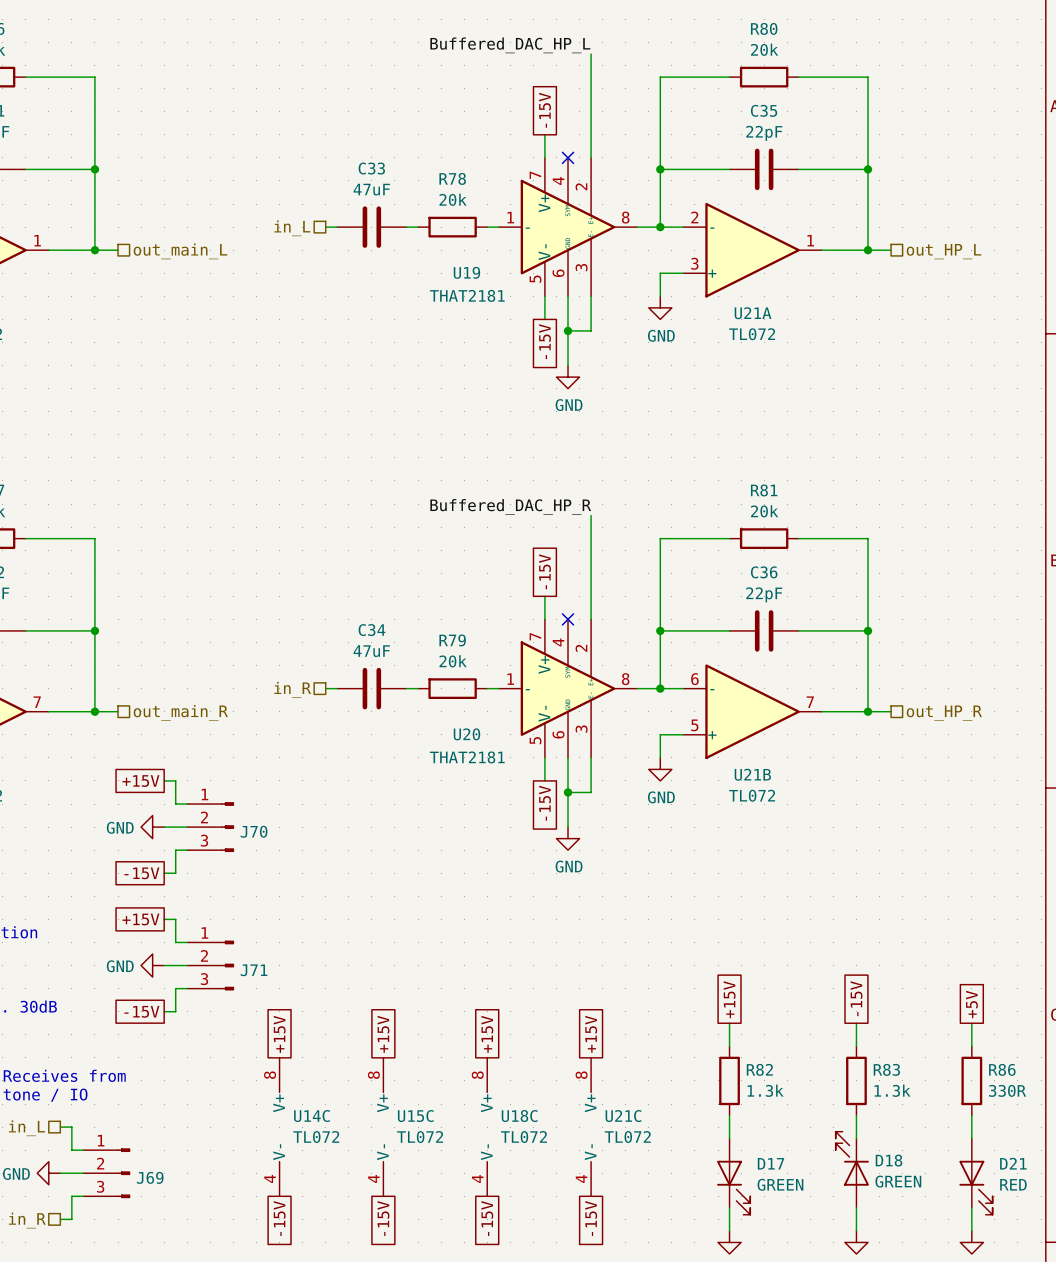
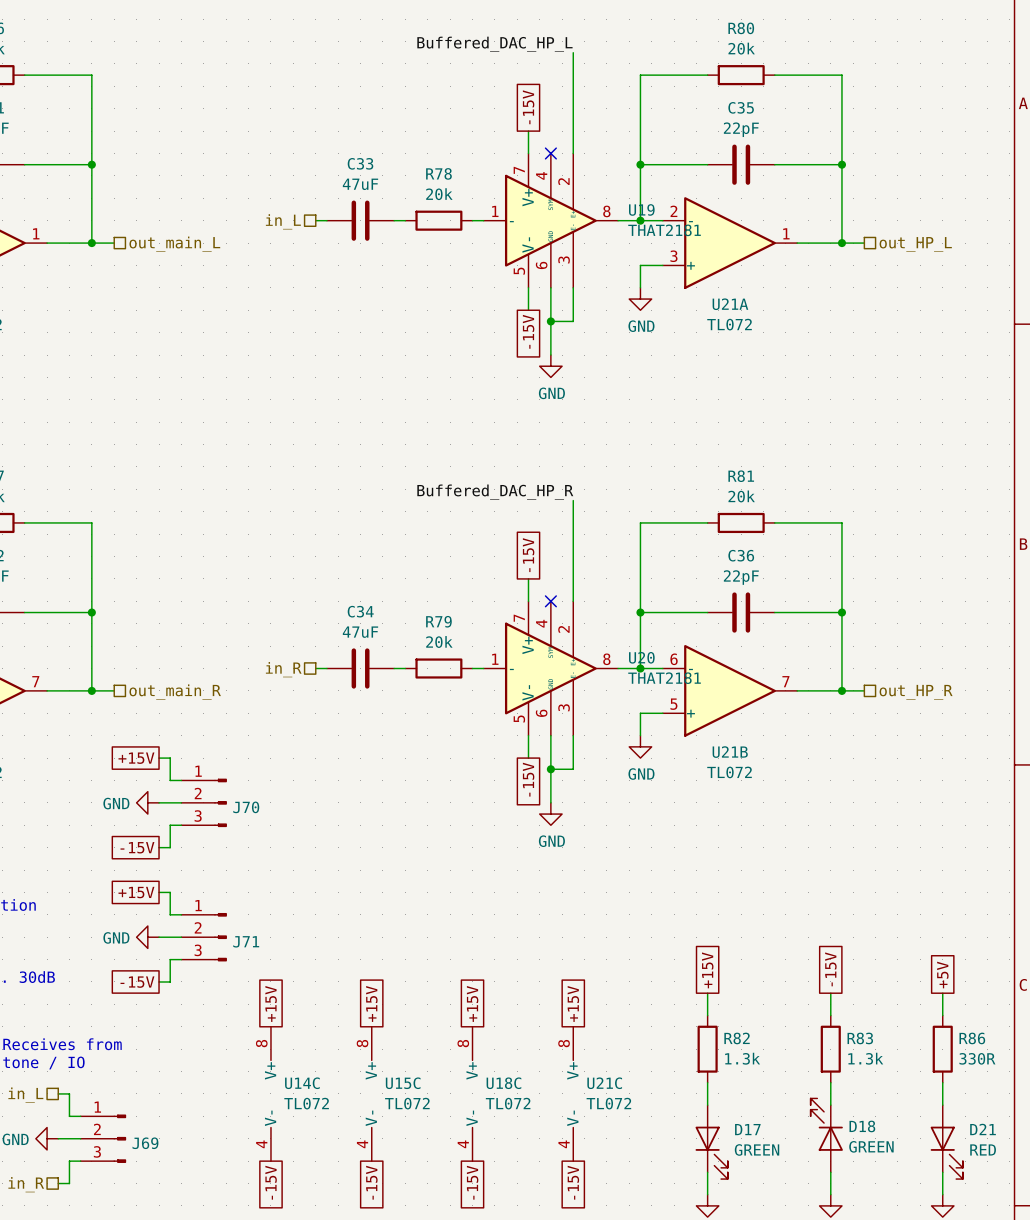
U19 name position: U19 (466, 272) -> U19 (641, 209)
U19 value position: THAT2181 (467, 295) -> THAT2181 (664, 230)
U20 name position: U20 (466, 734) -> U20 (641, 657)
U20 value position: THAT2181 (467, 757) -> THAT2181 (664, 678)

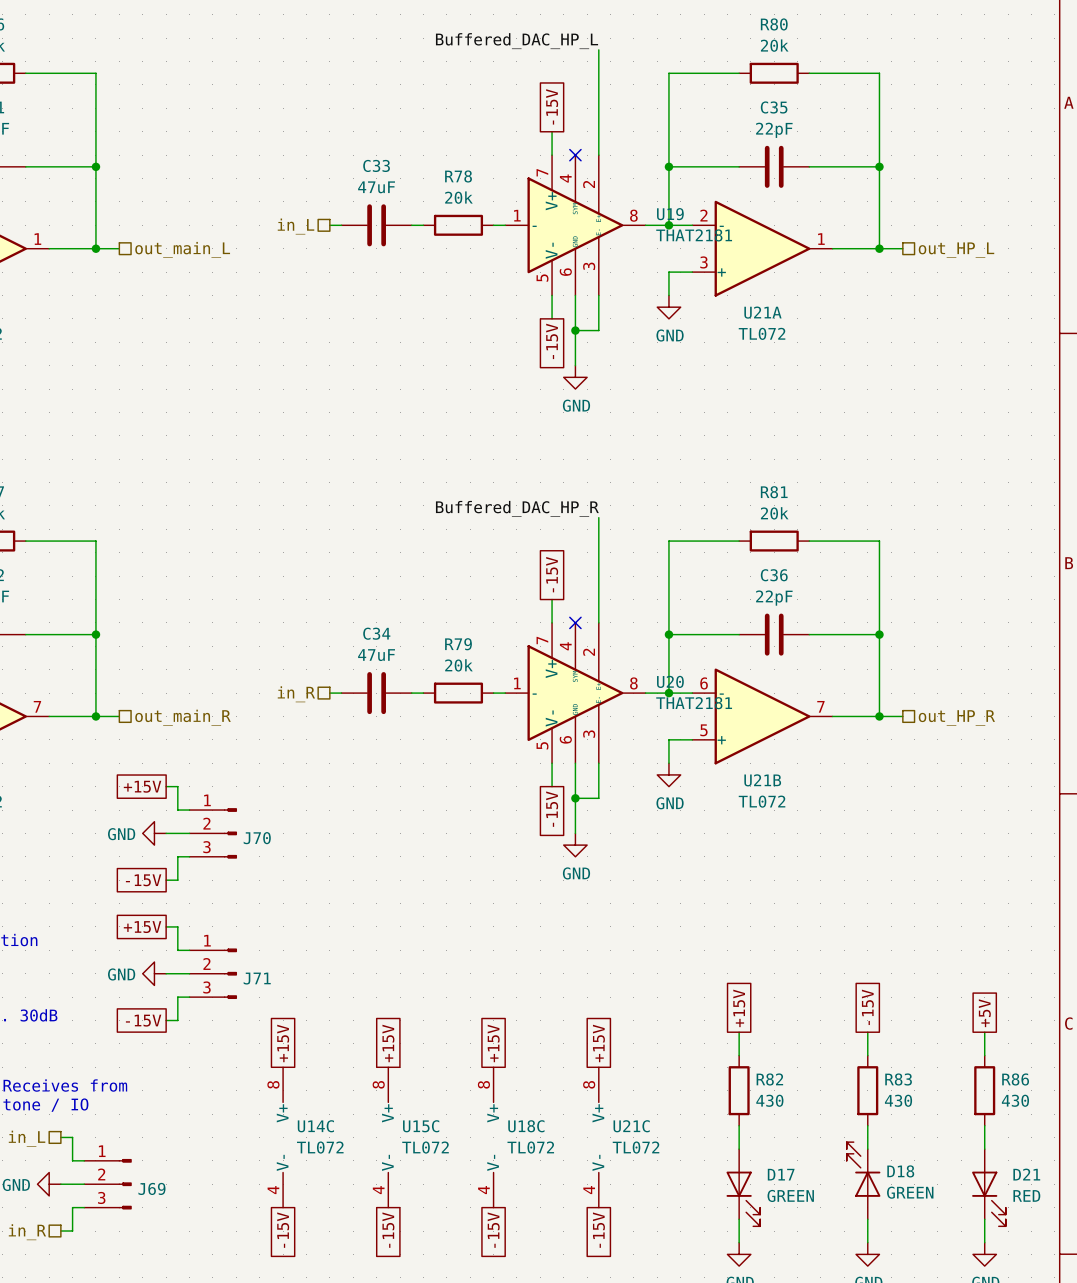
R82 value: 1.3k (742, 1058) -> 430 (769, 1100)
R83 value: 1.3k (865, 1058) -> 430 (898, 1100)
R86 value: 330R (977, 1058) -> 430 (1015, 1100)

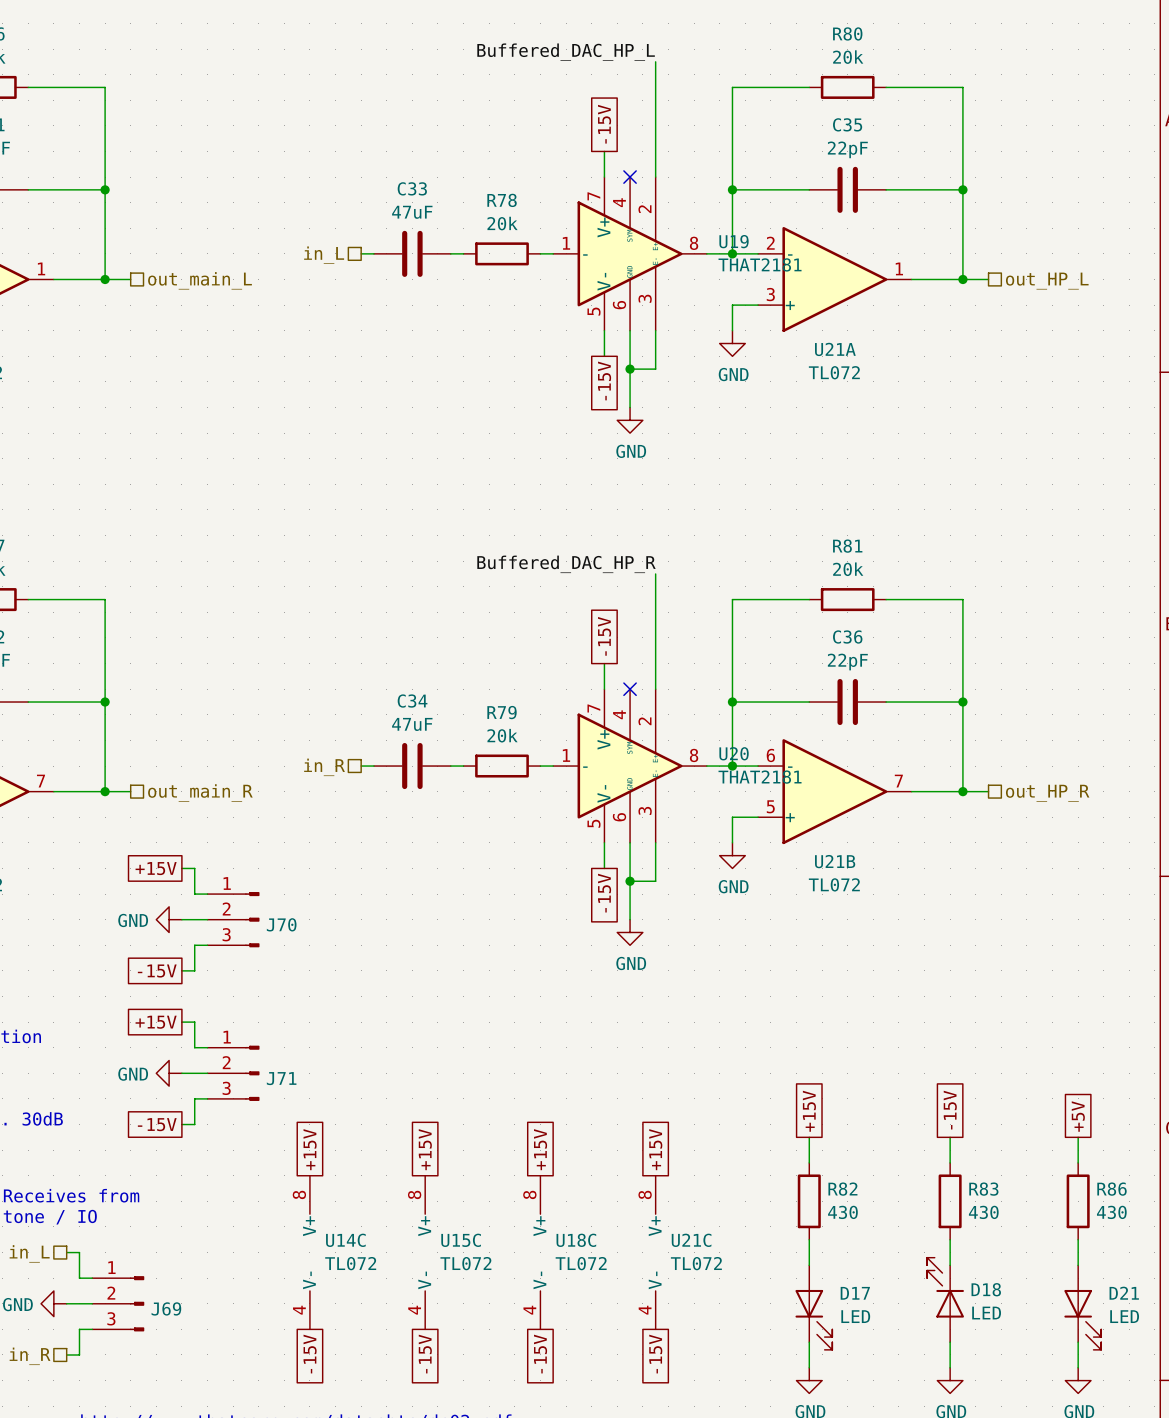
D18 value: GREEN (910, 1192) -> LED (986, 1313)
D17 value: GREEN (790, 1195) -> LED (855, 1316)
D21 value: RED (1026, 1195) -> LED (1124, 1316)

